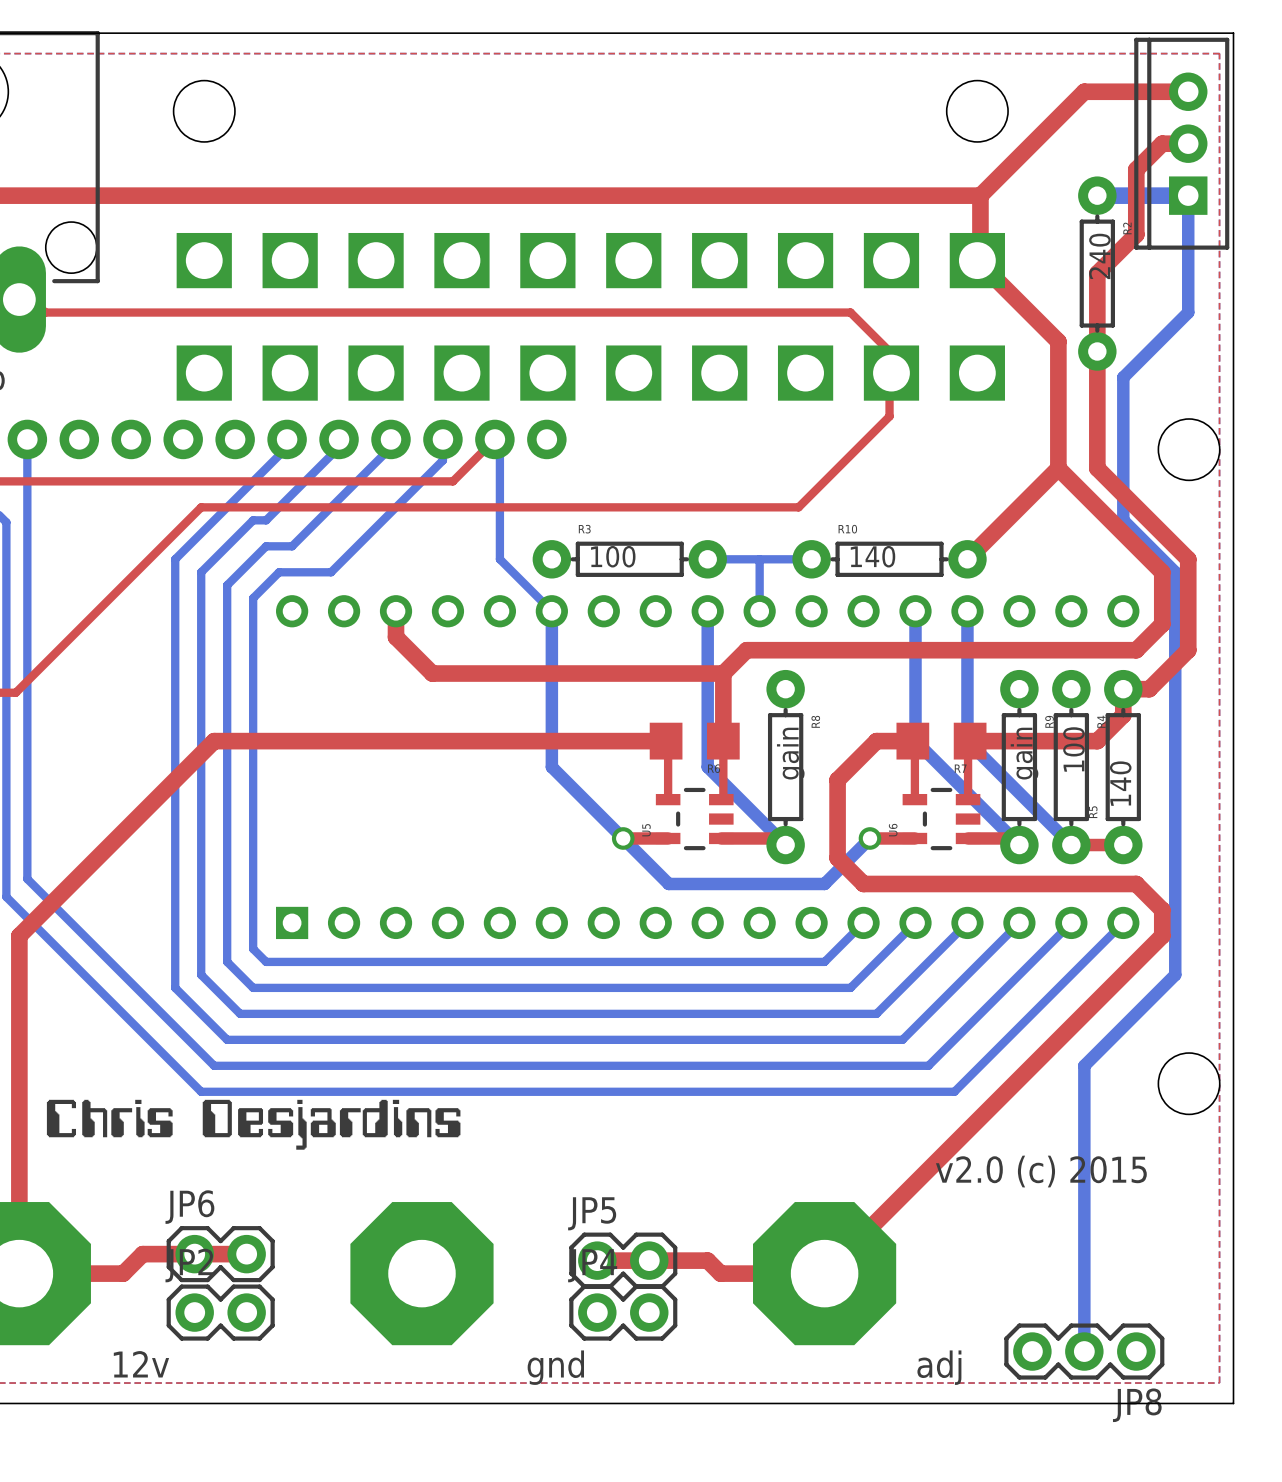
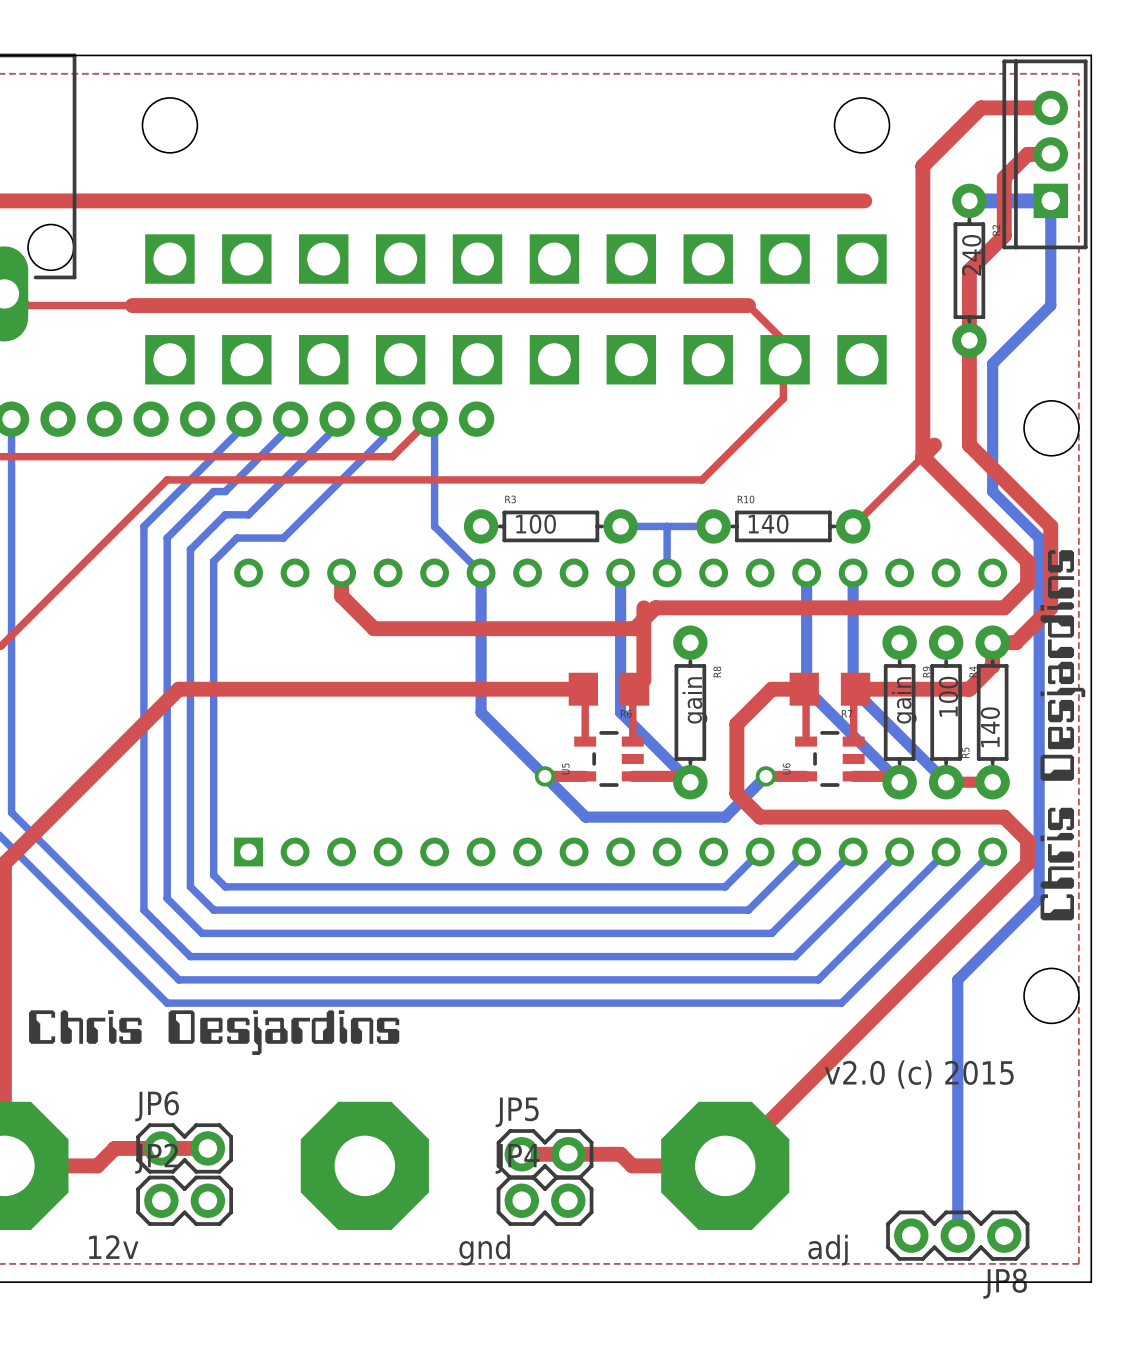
top track: (1110, 91) (1084, 91) (980, 195) (980, 257) (977, 260) (1058, 341) (1058, 468) (1162, 572) (1162, 598) -> (981, 107) (922, 166) (922, 456) (1027, 561)
top track width: thin (162, 312) (850, 312) -> thick (132, 305) (748, 305)
top track width: thick (1045, 481) (967, 559) -> thin (922, 456) (853, 526)
drawing: none -> [1040, 550, 1086, 921]
top track: (723, 673) (723, 797) (721, 799) -> (643, 607) (643, 679) (632, 691) (632, 741)

